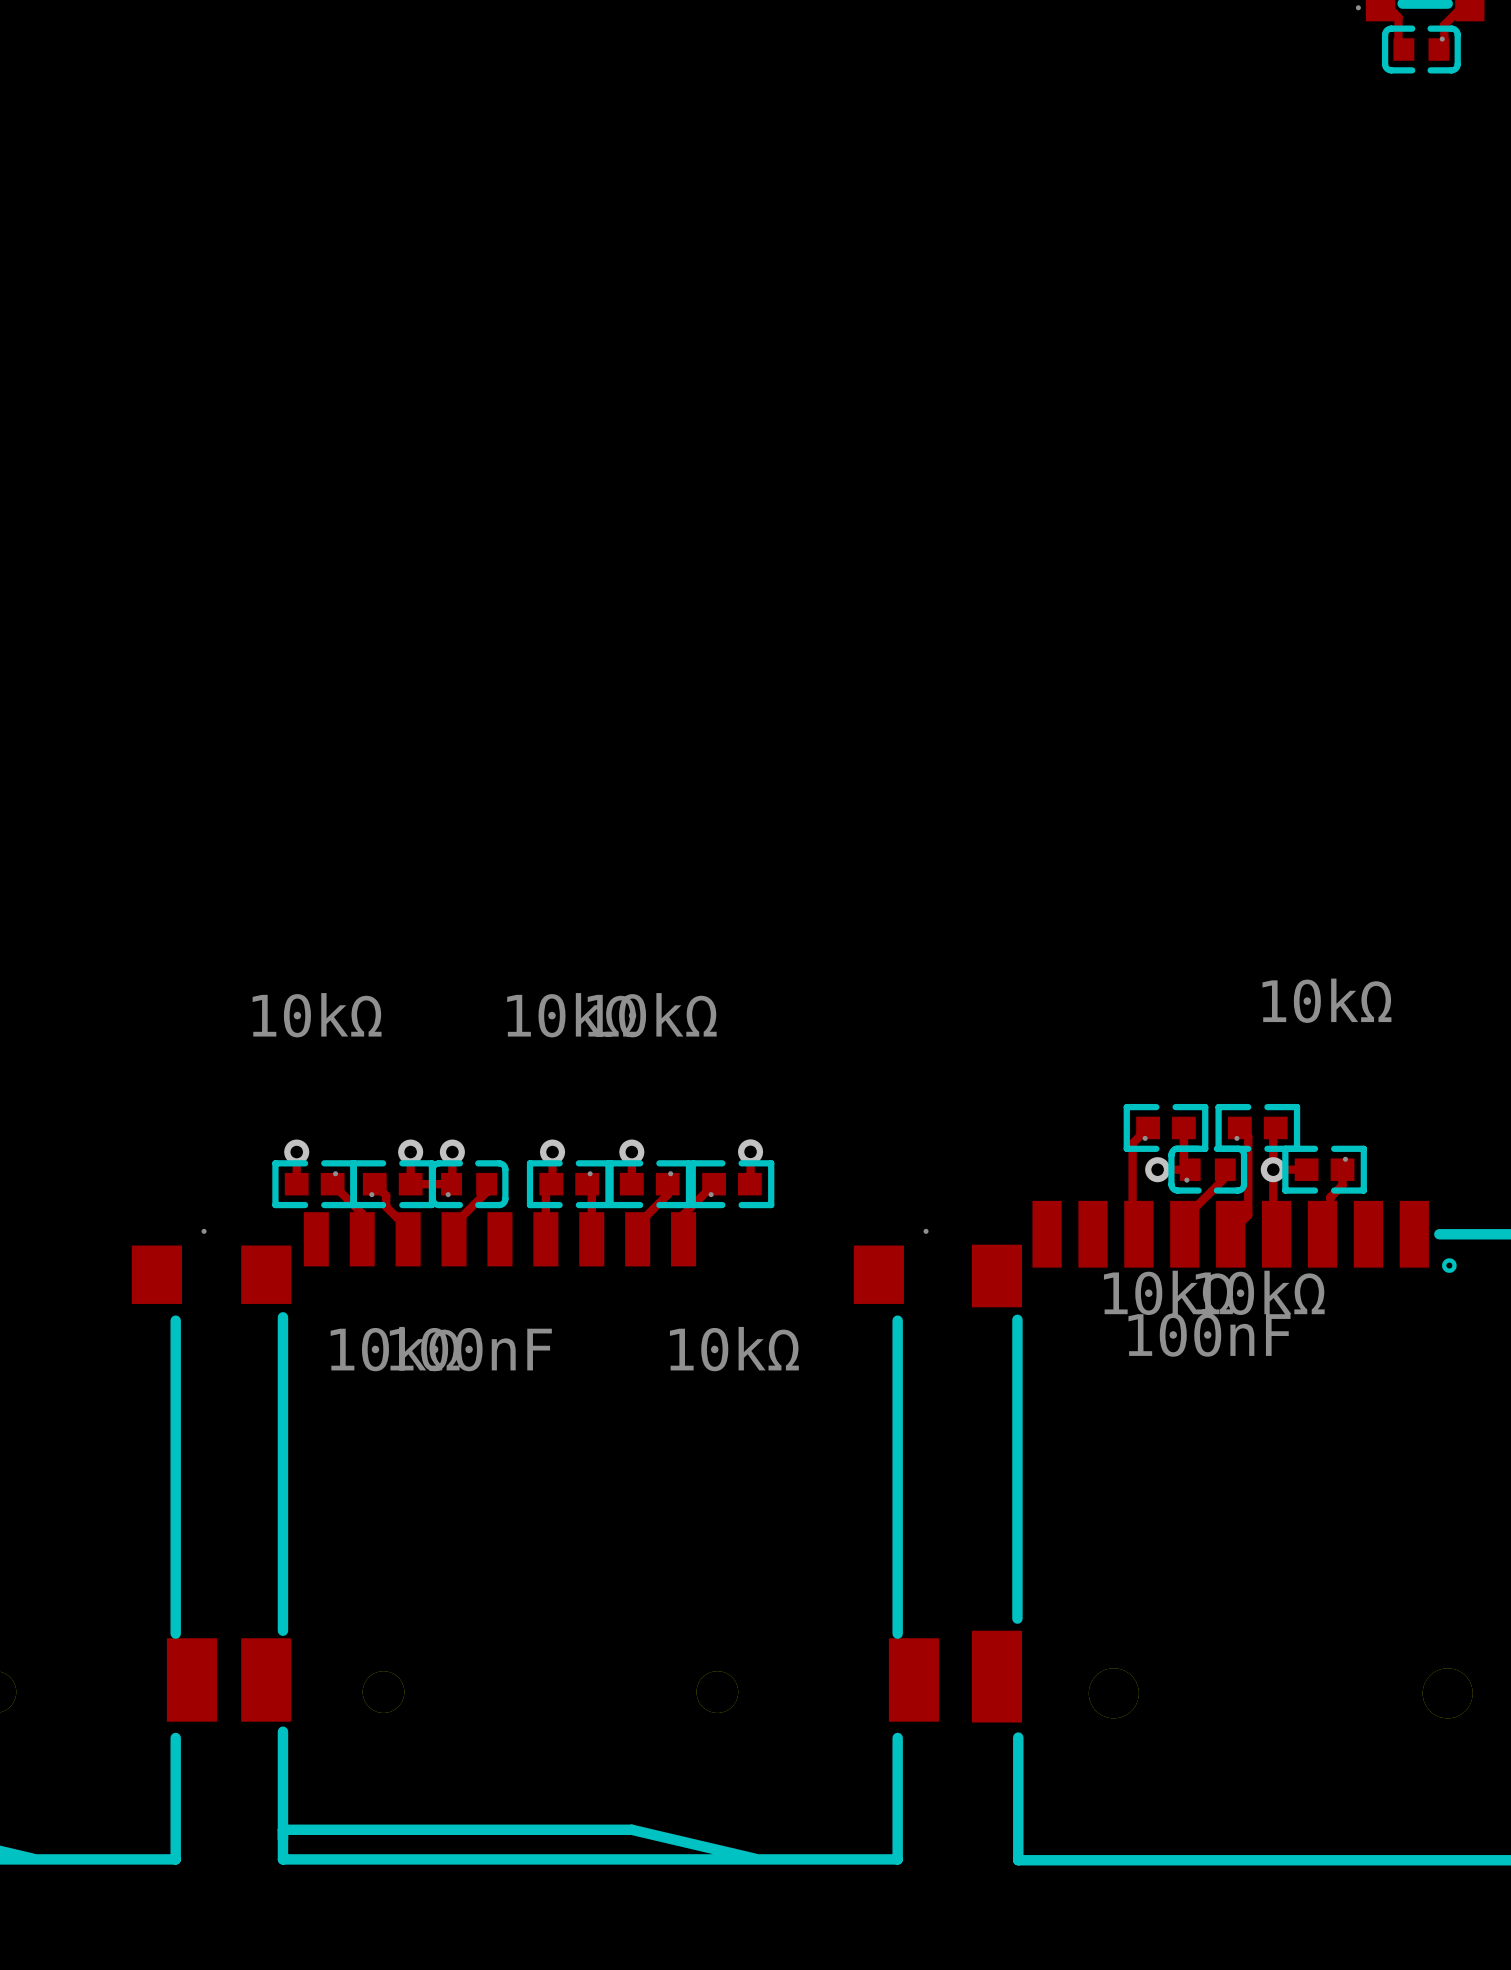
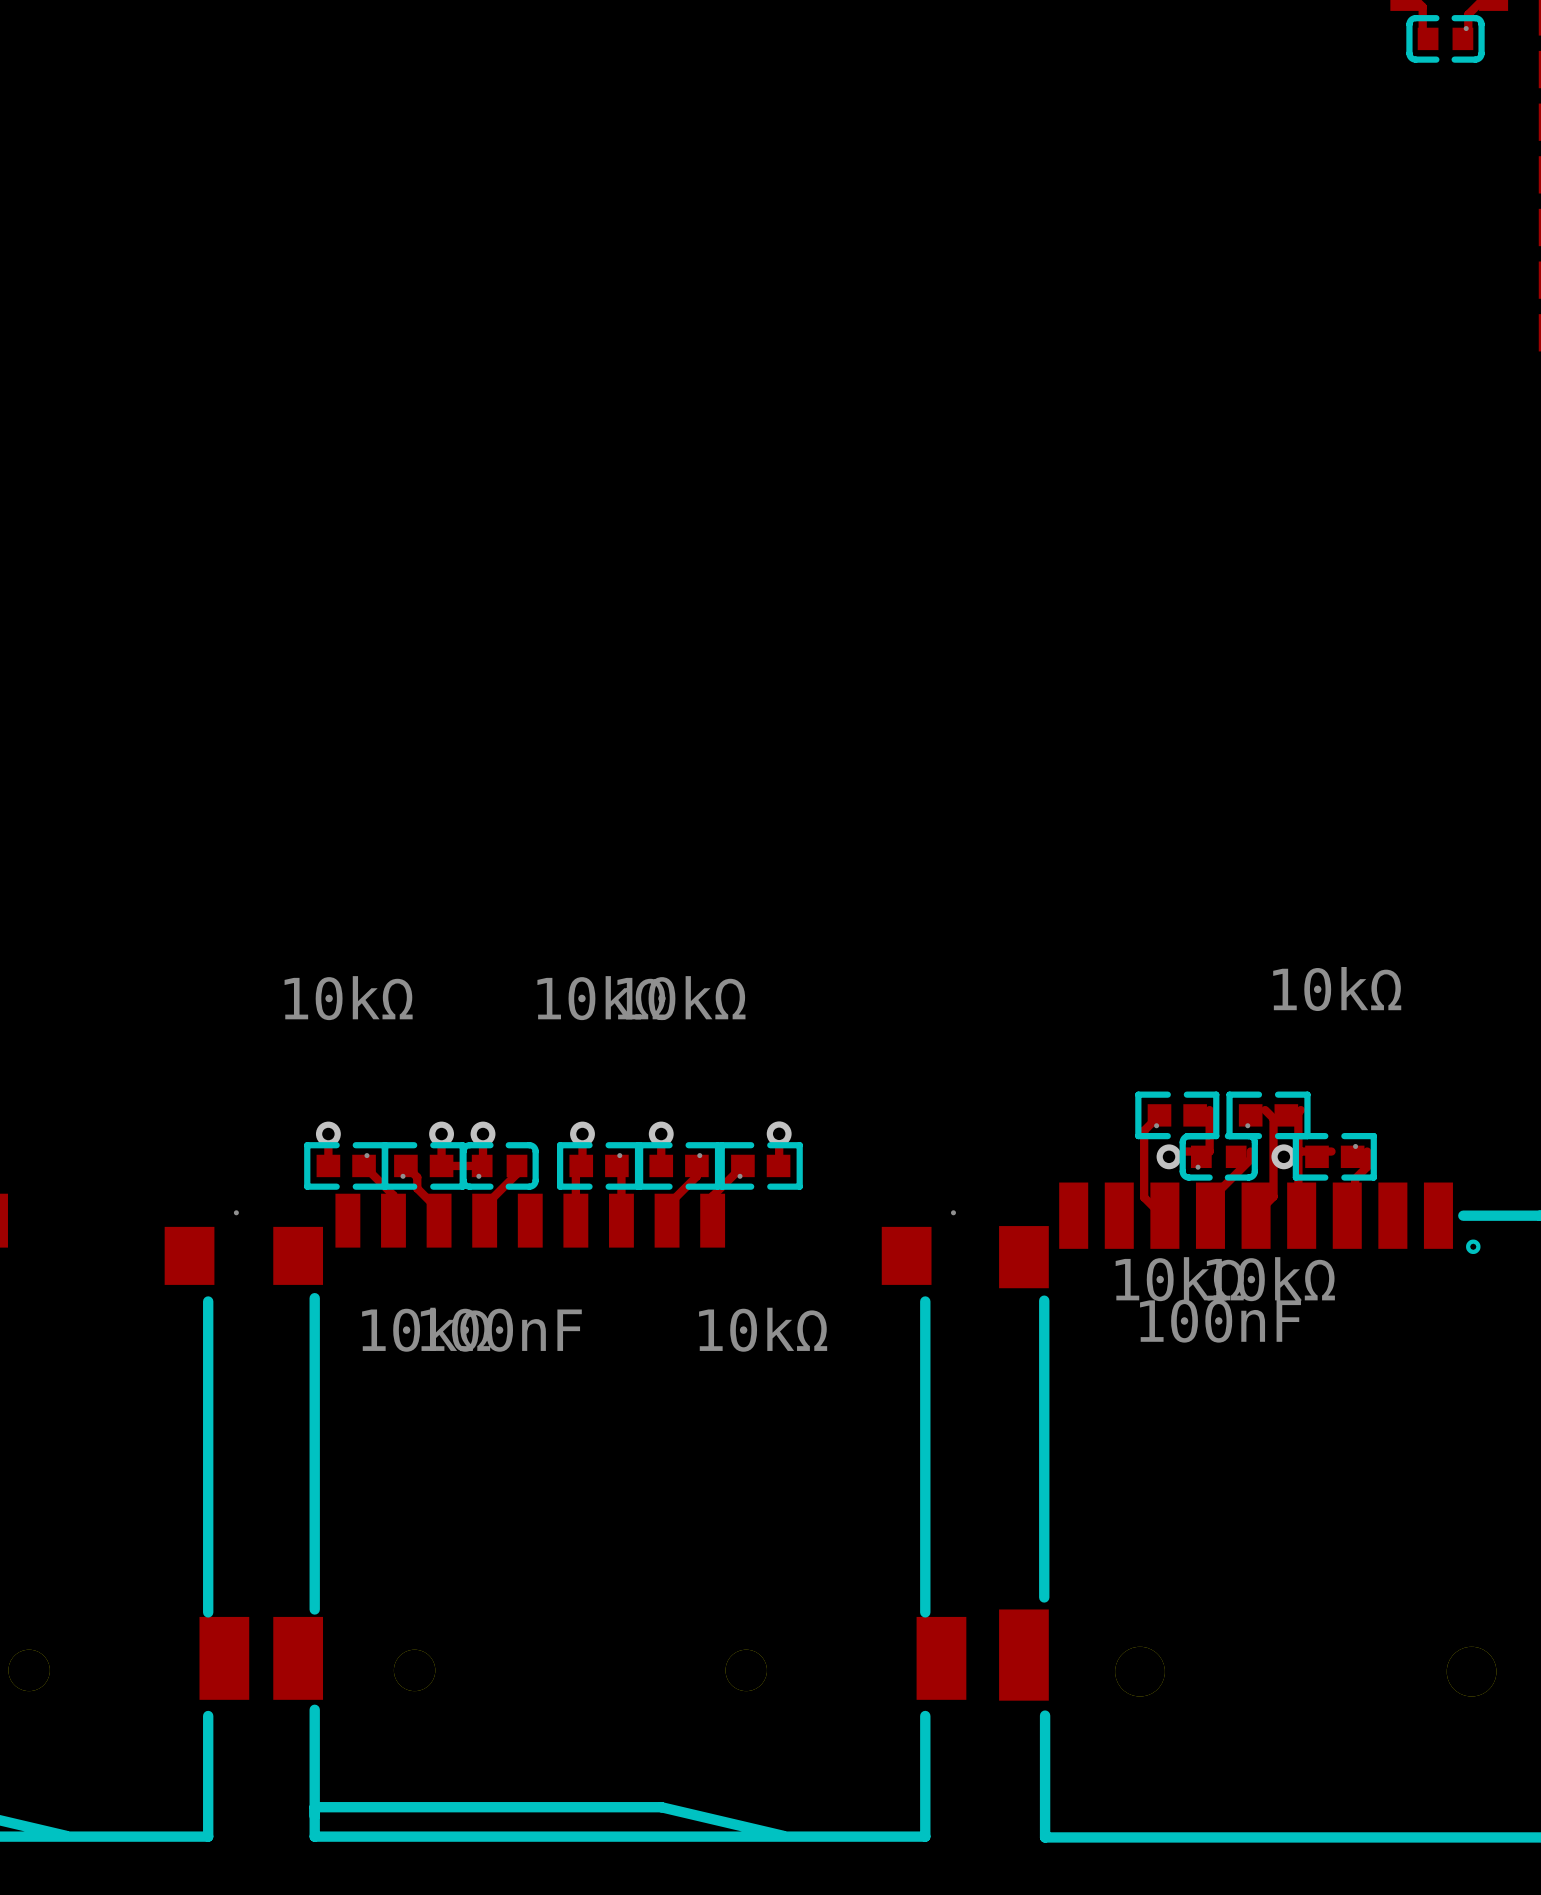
top track: (1148, 1127) (1132, 1143) (1132, 1210) (1146, 1224) -> (1159, 1115) (1144, 1130) (1144, 1197) (1158, 1211)
part position: (1165, 1127) -> (1177, 1115)
part position: (1257, 1127) -> (1268, 1115)
via position: (1157, 1169) -> (1169, 1156)
part position: (1207, 1169) -> (1218, 1156)
via position: (1273, 1169) -> (1283, 1156)
part position: (1324, 1169) -> (1334, 1156)

